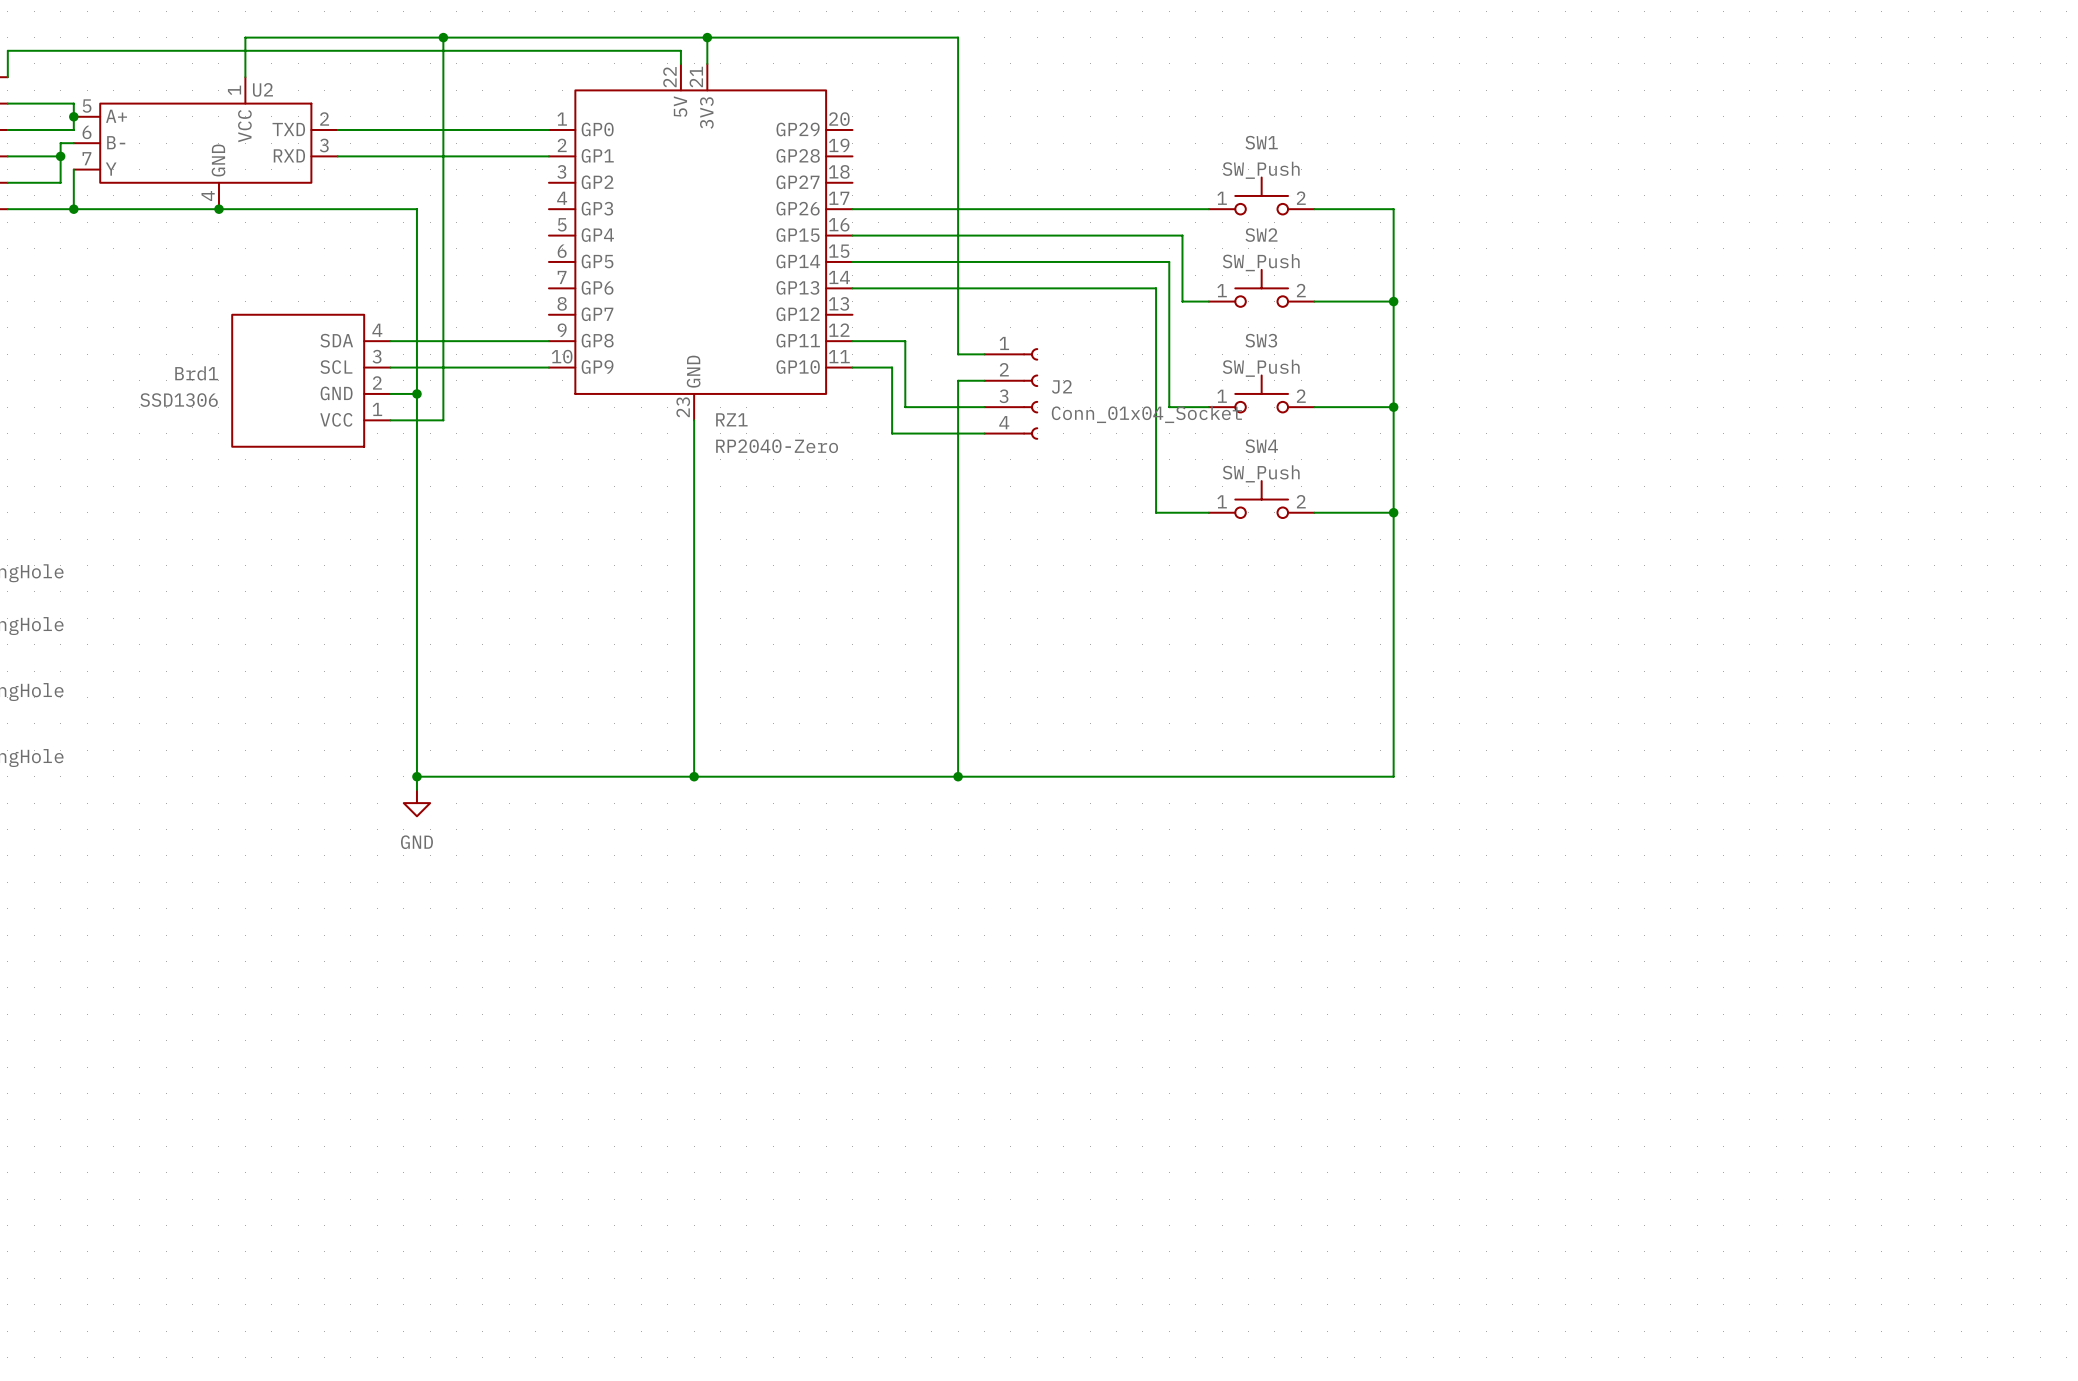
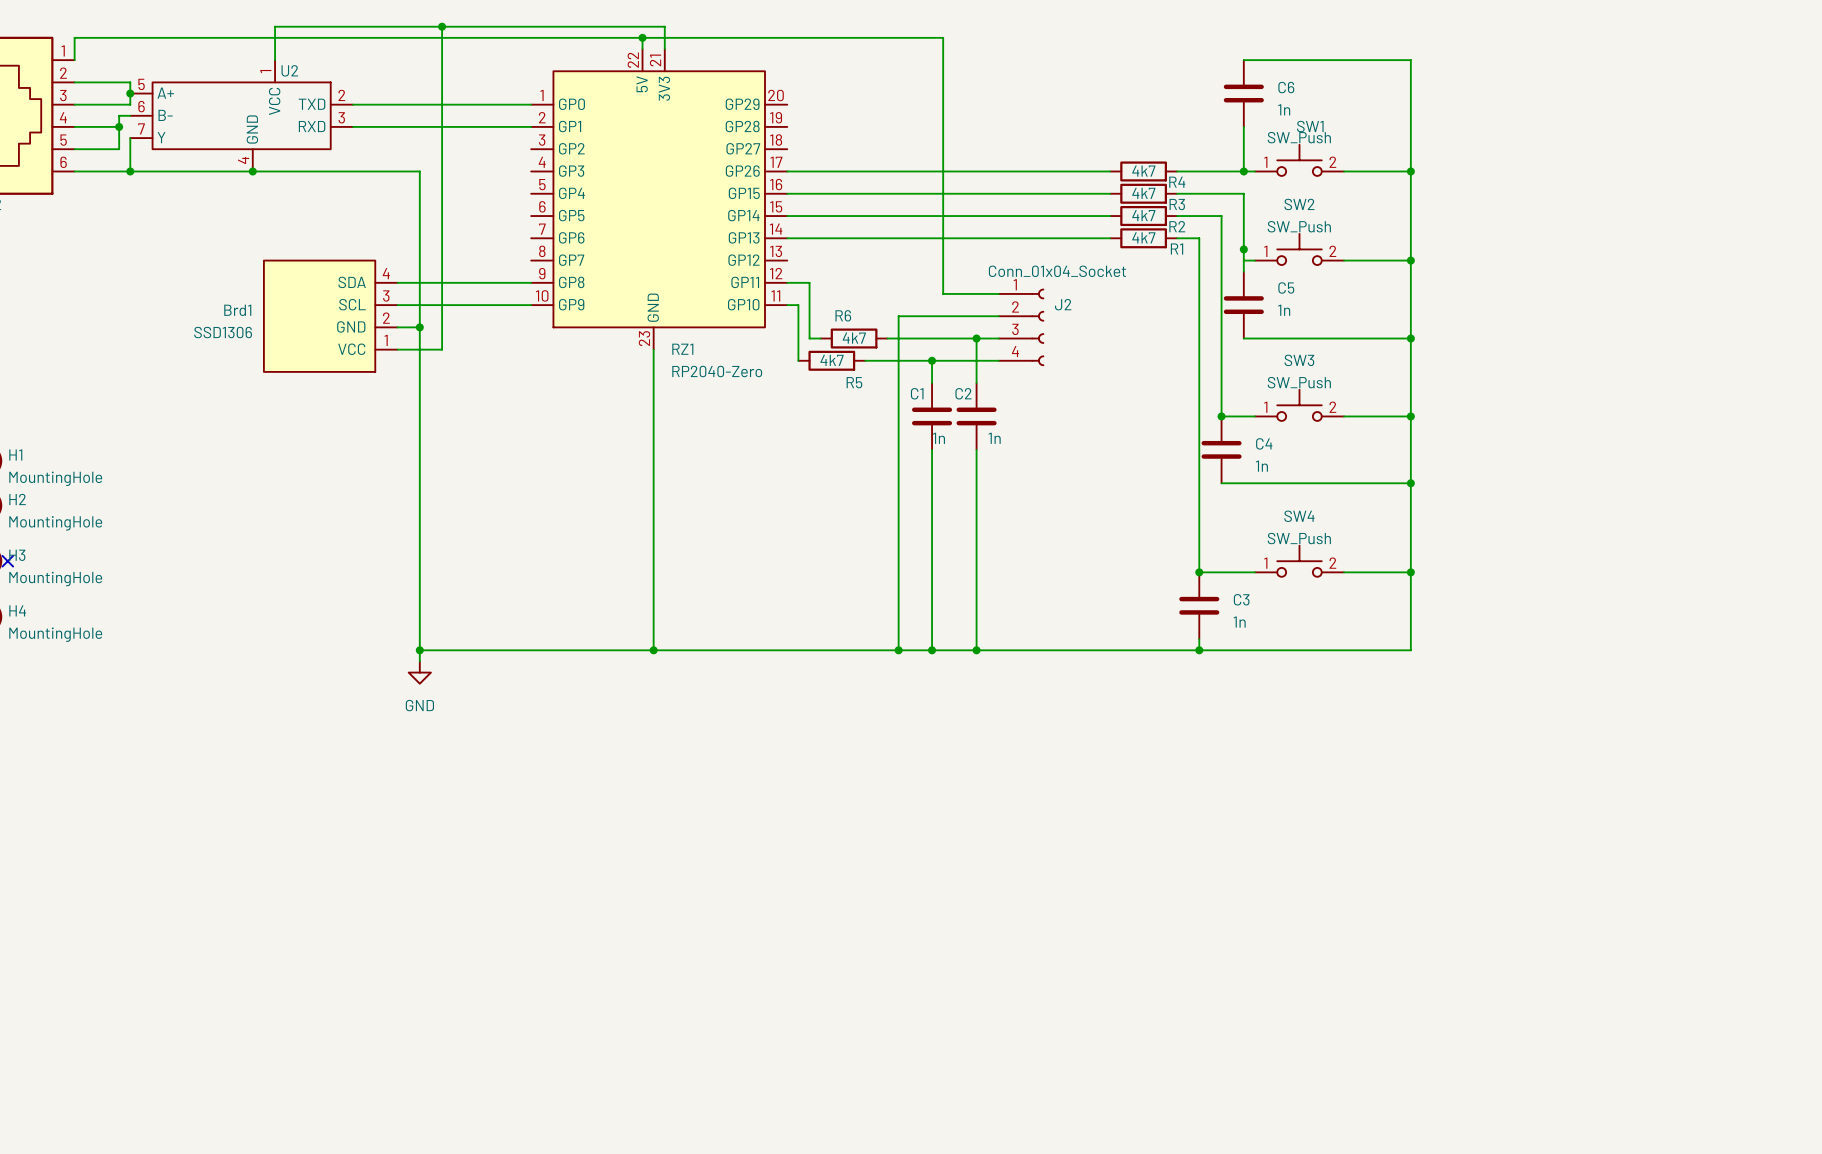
wire: (707, 37) (958, 37) (958, 354) (984, 354) -> none
junction position: (707, 37) -> (642, 37)
wire: none -> (642, 37) (943, 37) (943, 293) (998, 293)
C6: none -> 1n (1243, 93)
SW1 name position: SW1 (1261, 142) -> SW1 (1310, 126)
wire: none -> (1243, 126) (1243, 171) (1254, 171)
SW1 position: (1261, 195) -> (1299, 160)
R4: none -> 4k7 (1143, 171)
wire: (1393, 209) (1393, 235) -> (1177, 193) (1243, 193)
junction: none -> (1243, 171)
junction: none -> (1410, 171)
wire: (1182, 235) (1182, 301) (1208, 301) -> (1065, 193) (1110, 193)
R3: none -> 4k7 (1143, 193)
wire: (1169, 261) (1169, 407) (1208, 407) -> (1054, 216) (1110, 216)
R2: none -> 4k7 (1143, 216)
wire: none -> (1177, 216) (1221, 216) (1221, 416) (1254, 416)
wire: (1156, 288) (1156, 512) (1208, 512) -> (1043, 238) (1110, 238)
SW2 position: (1261, 288) -> (1299, 249)
R1: none -> 4k7 (1143, 238)
wire: none -> (1177, 238) (1199, 238) (1199, 572) (1254, 572)
wire: (1314, 301) (1393, 301) -> (1344, 171) (1410, 171)
wire: none -> (1243, 260) (1254, 260)
wire: none -> (1344, 260) (1410, 260)
junction: none -> (1410, 260)
wire: (1393, 327) (1393, 776) -> (1243, 60) (1410, 60) (1410, 650) (1243, 650)
wire: (878, 341) (905, 341) (905, 407) (971, 407) -> (809, 282) (809, 338) (820, 338)
wire: (865, 367) (892, 367) (892, 433) (944, 433) -> (798, 305) (798, 360)
C5: none -> 1n (1243, 305)
wire: (984, 380) (958, 380) (958, 776) -> none
wire: none -> (998, 316) (898, 316) (898, 650)
J2 name position: J2 (1061, 386) -> J2 (1063, 304)
J2 position: (1011, 393) -> (1021, 327)
SW3 position: (1261, 393) -> (1299, 405)
R6: none -> 4k7 (854, 338)
wire: none -> (898, 338) (998, 338)
wire: none -> (976, 338) (976, 383)
junction: none -> (976, 338)
wire: (1314, 407) (1393, 407) -> (1410, 338) (1243, 338)
junction: (1393, 407) -> none
junction: none -> (1410, 338)
J2 value position: Conn_01x04_Socket (1146, 414) -> Conn_01x04_Socket (1057, 271)
R5: none -> 4k7 (831, 360)
wire: none -> (898, 360) (998, 360)
wire: none -> (932, 360) (932, 383)
junction: none -> (932, 360)
C1: none -> 1n (932, 416)
C2: none -> 1n (976, 416)
SW4 position: (1261, 499) -> (1299, 561)
junction: none -> (1410, 416)
wire: (1314, 512) (1393, 512) -> (1344, 416) (1410, 416)
junction position: (1393, 512) -> (1221, 416)
wire: none -> (932, 449) (932, 650)
wire: none -> (976, 449) (976, 650)
C4: none -> 1n (1221, 449)
wire: none -> (1221, 483) (1410, 483)
junction: none -> (1410, 483)
junction: none -> (1199, 572)
wire: none -> (1344, 572) (1410, 572)
junction: none -> (1410, 572)
C3: none -> 1n (1199, 605)
wire: none -> (1199, 639) (1199, 650)
junction position: (958, 776) -> (898, 650)
junction: none -> (932, 650)
junction: none -> (976, 650)
junction: none -> (1199, 650)

